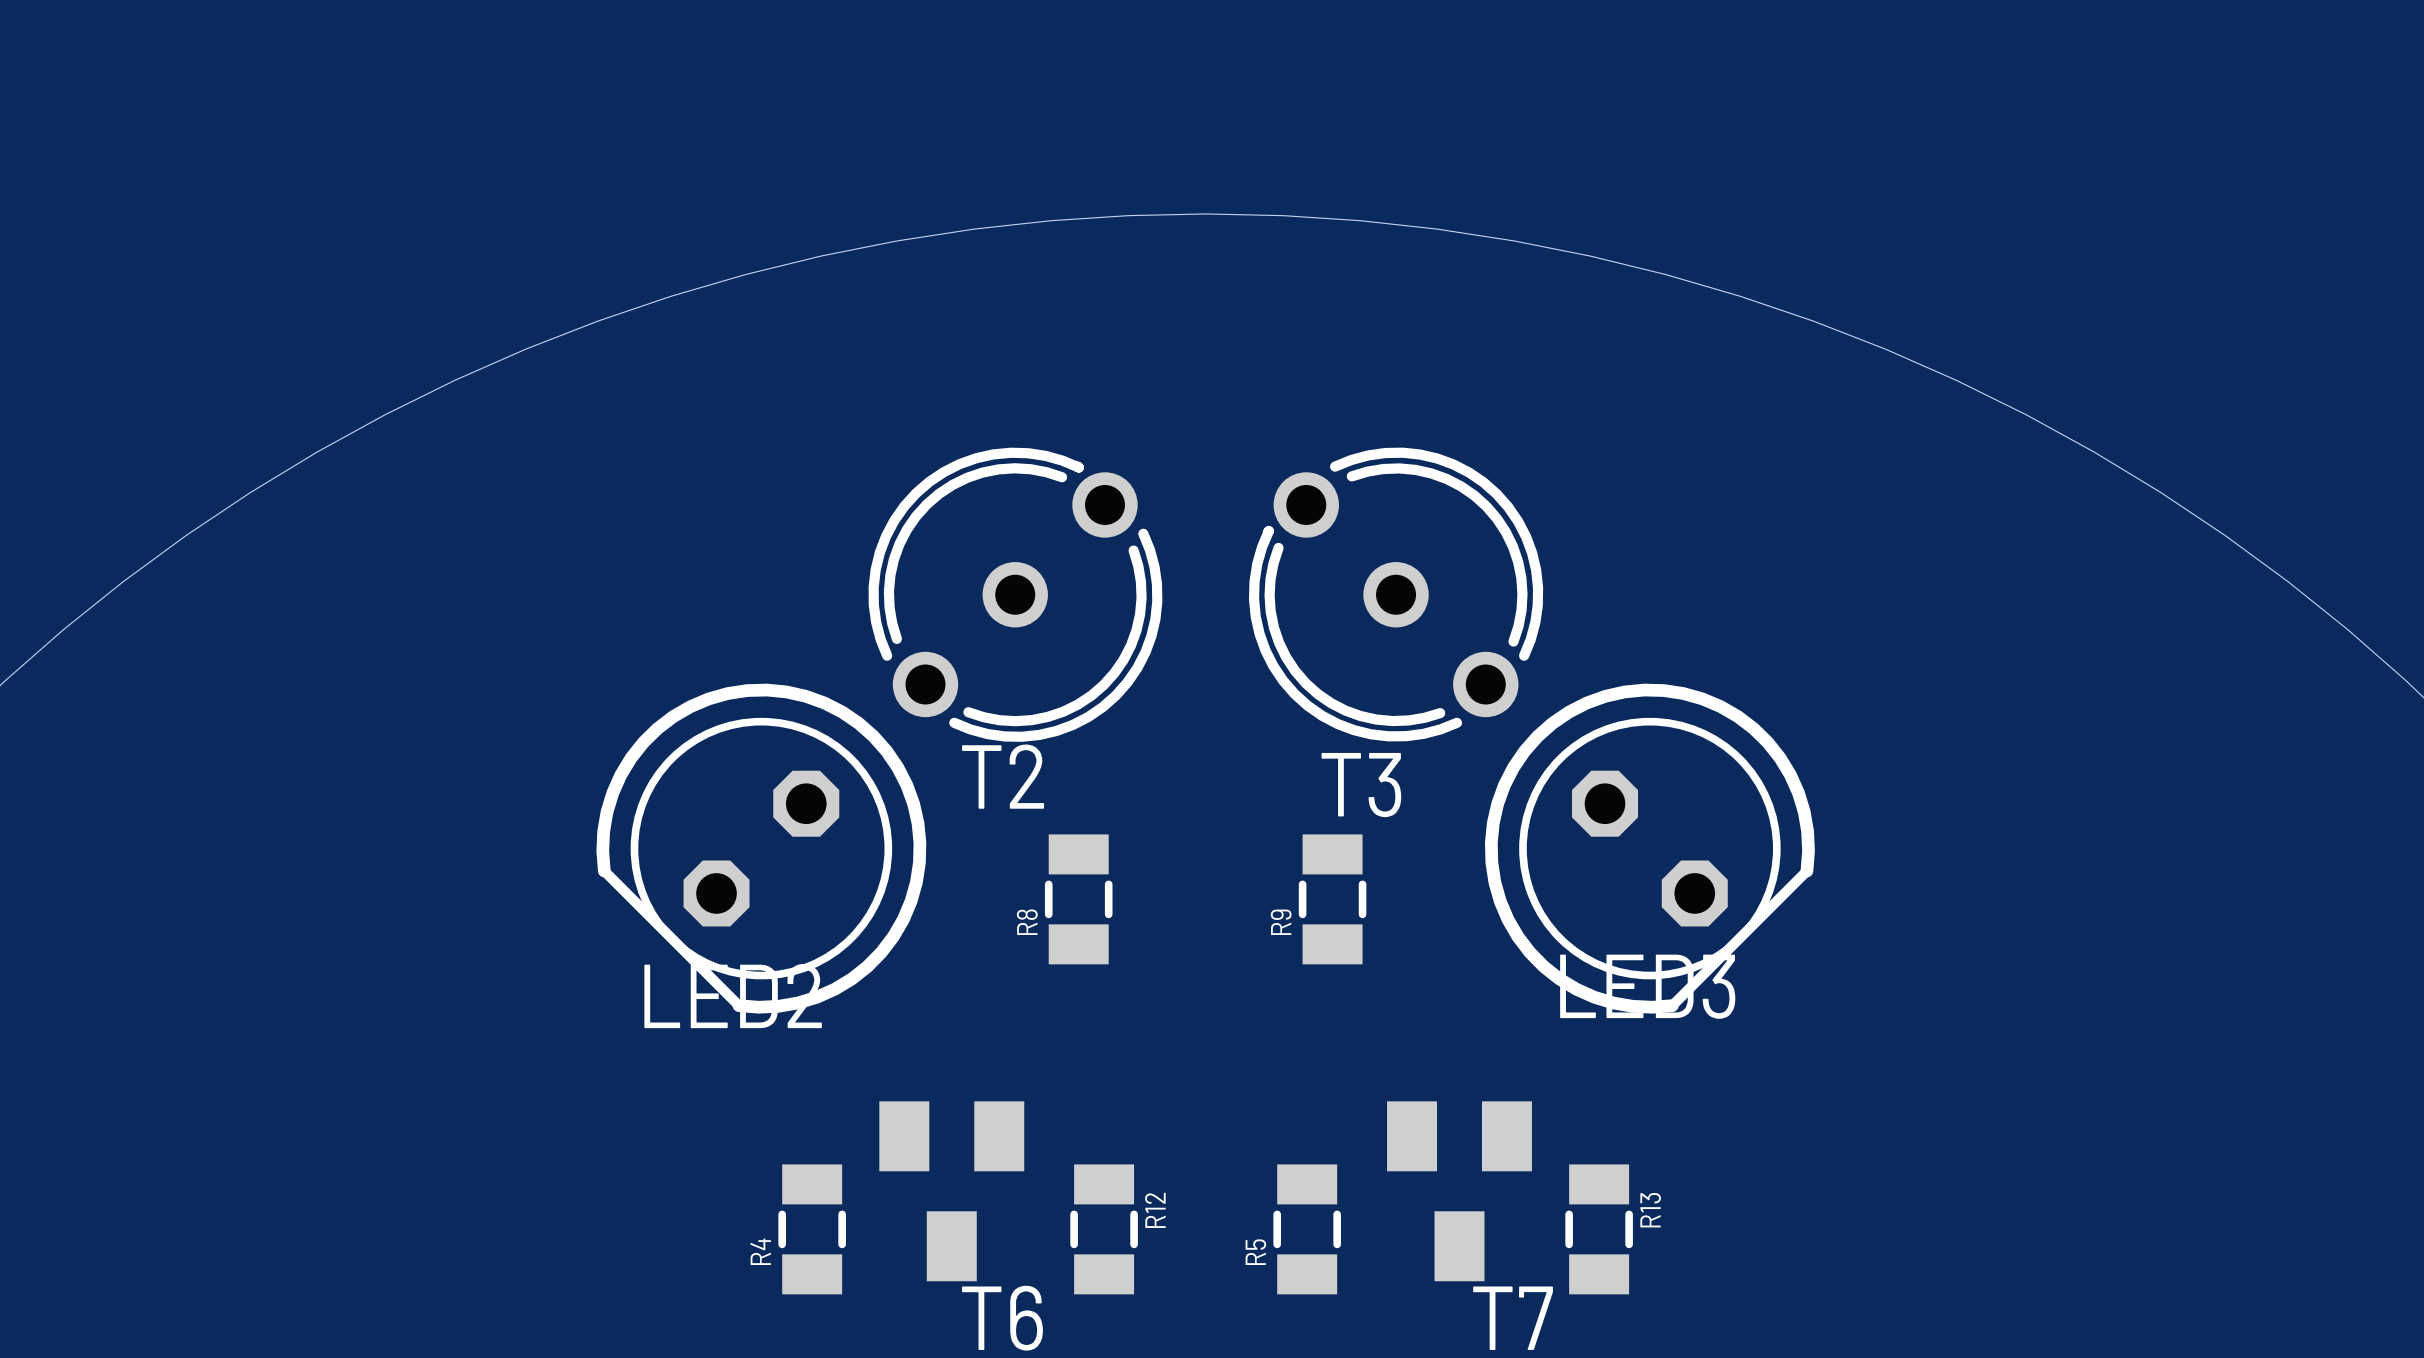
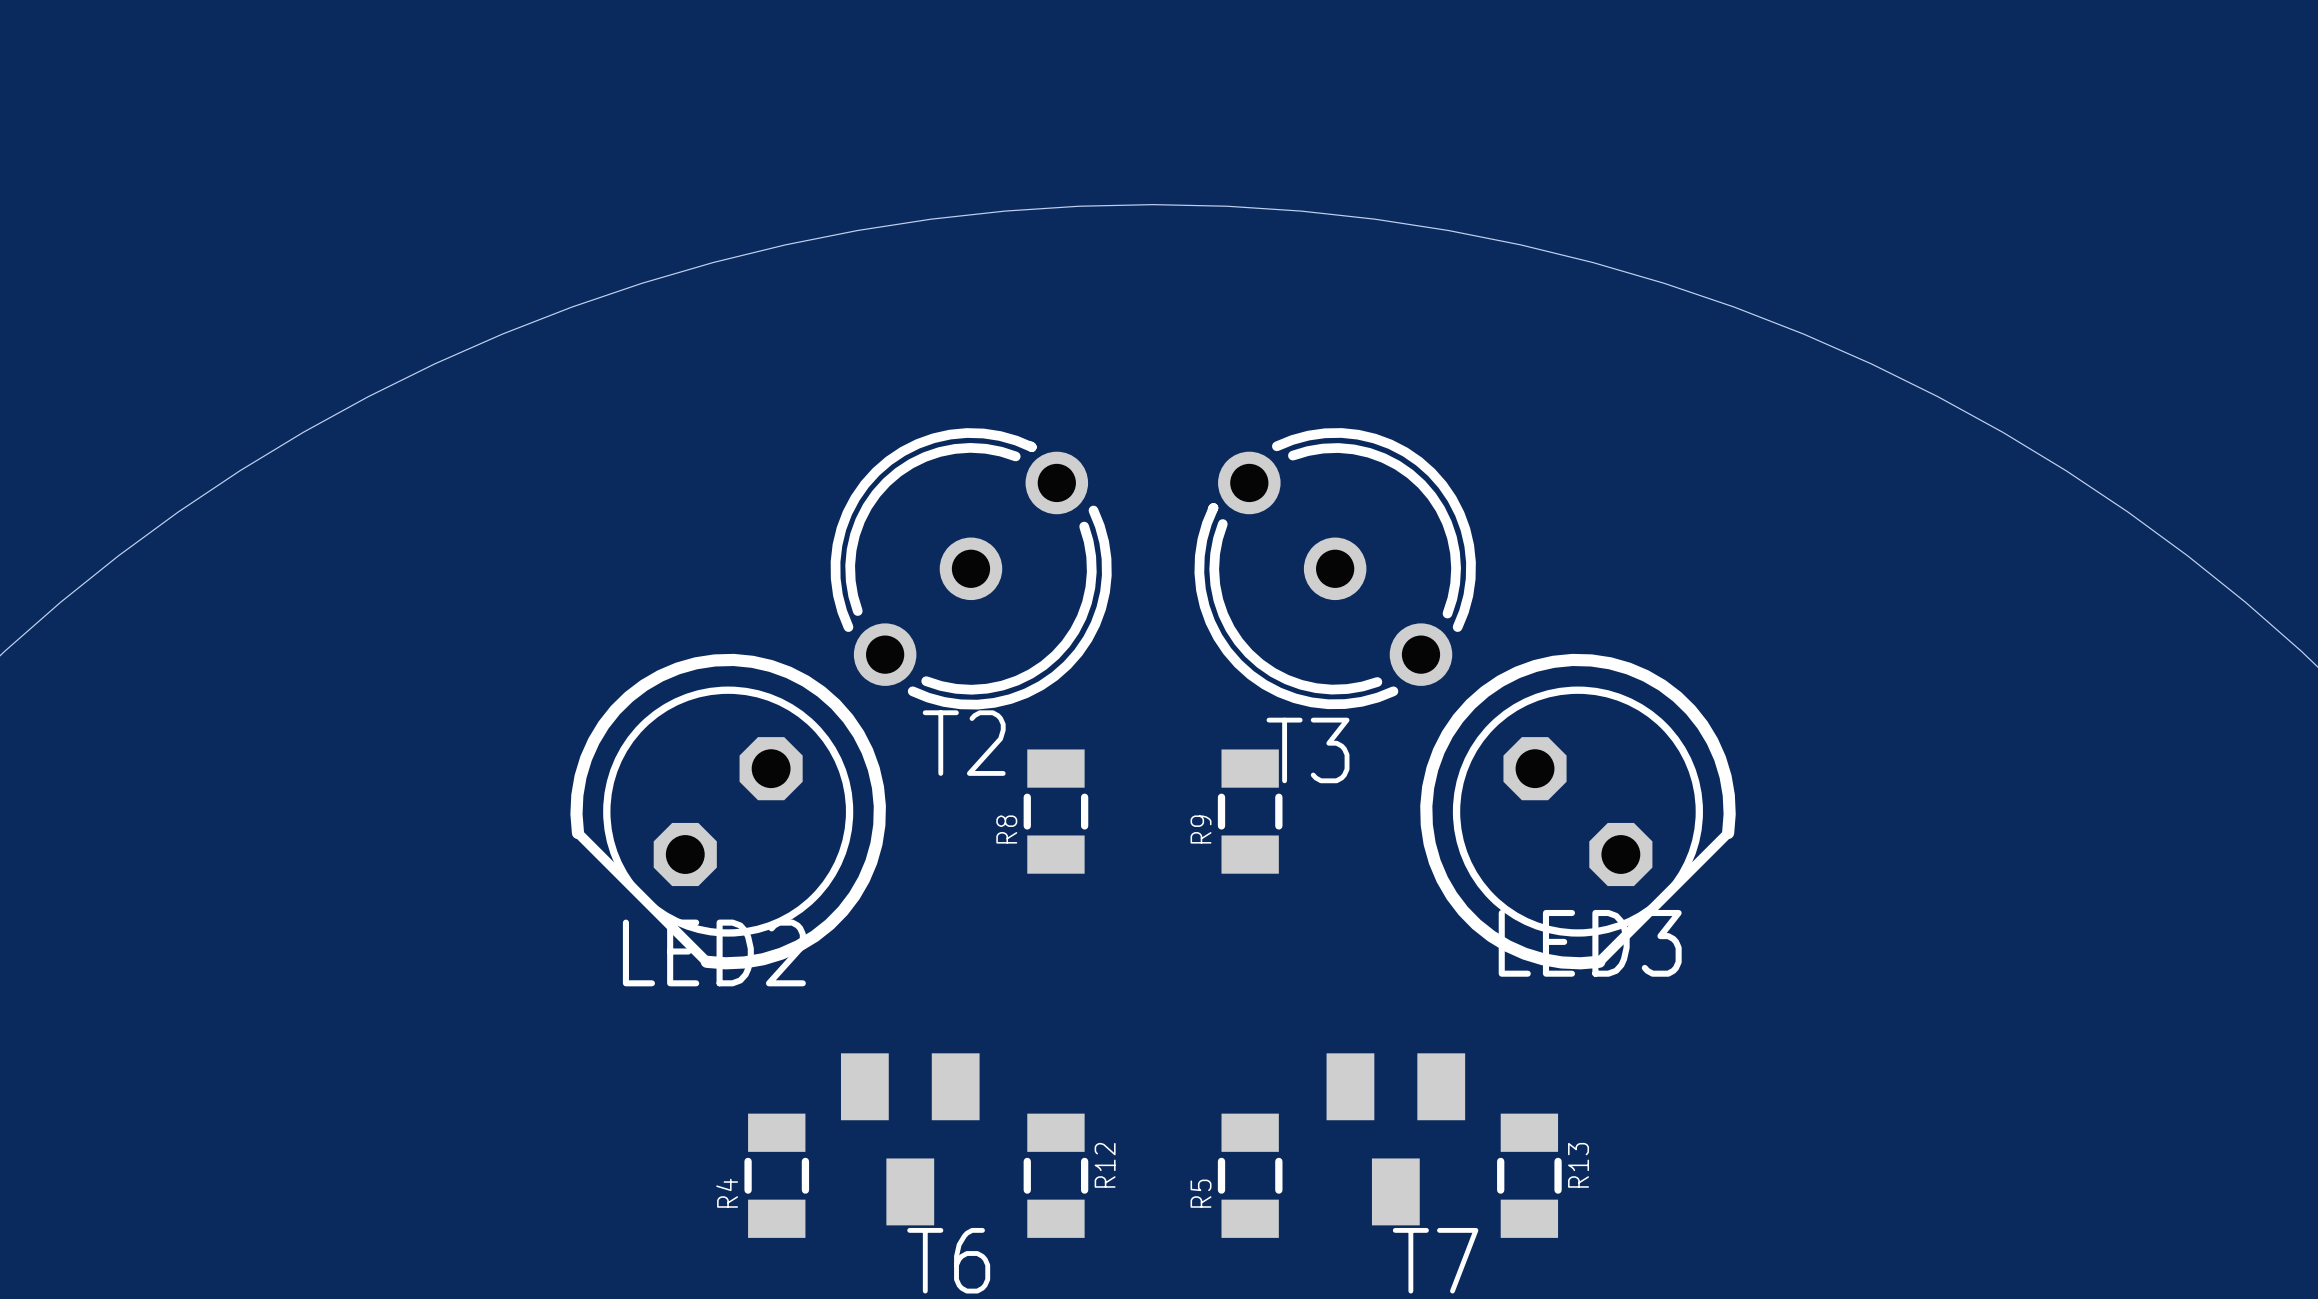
R8 position: (1078, 899) -> (1055, 811)
R9 position: (1332, 899) -> (1250, 811)

